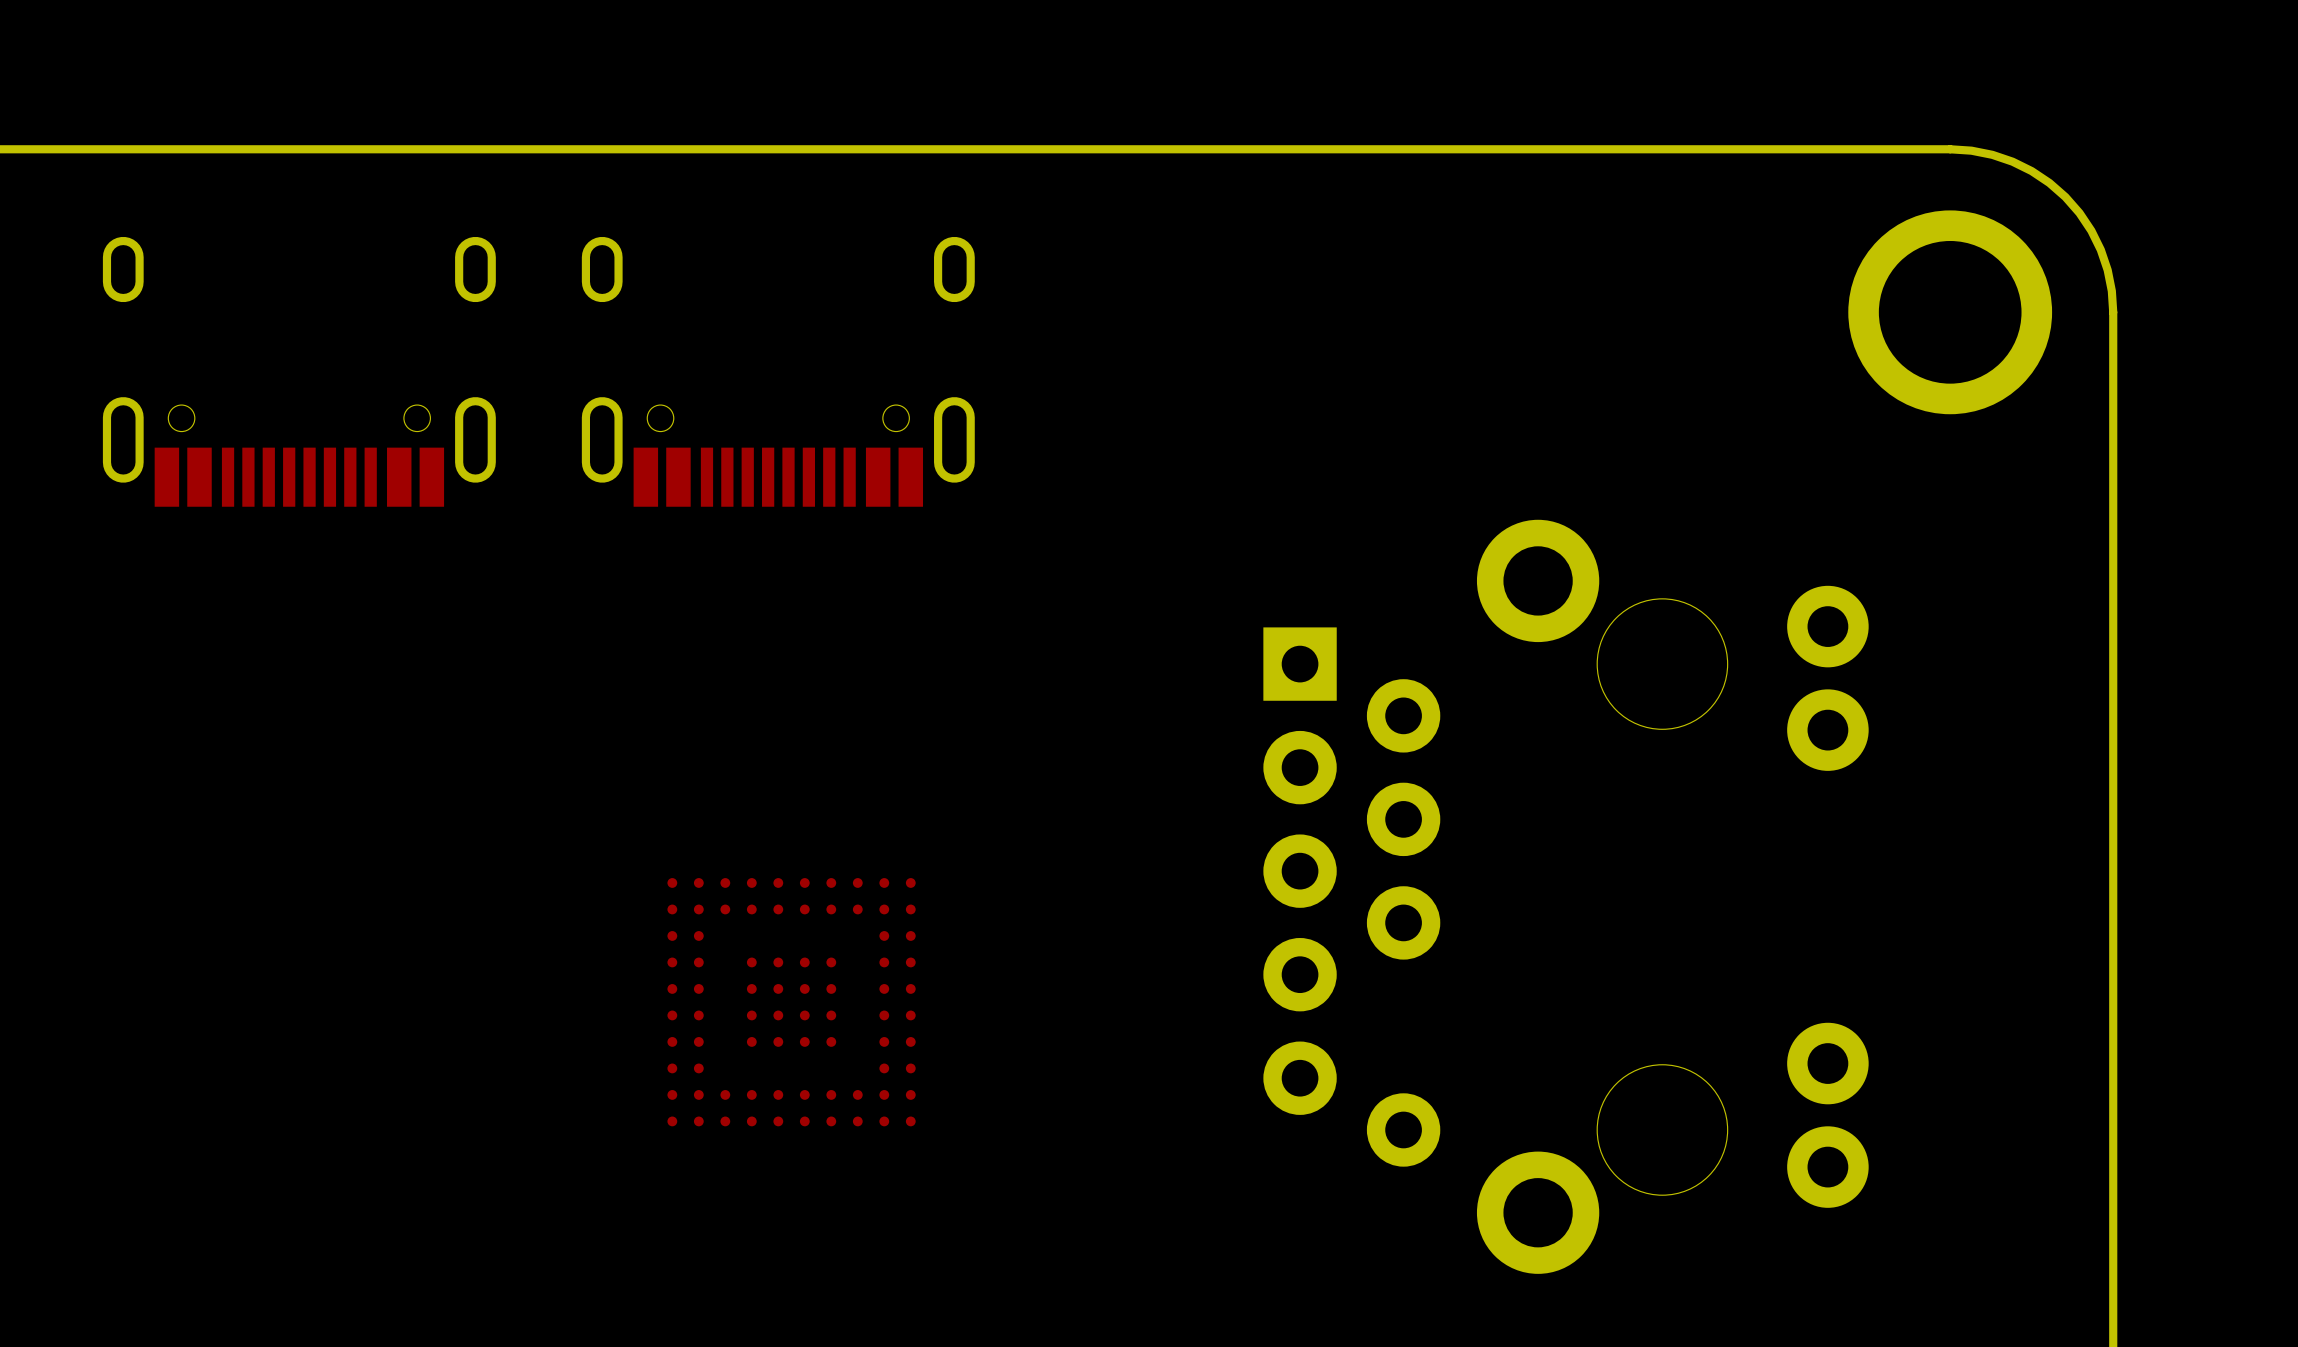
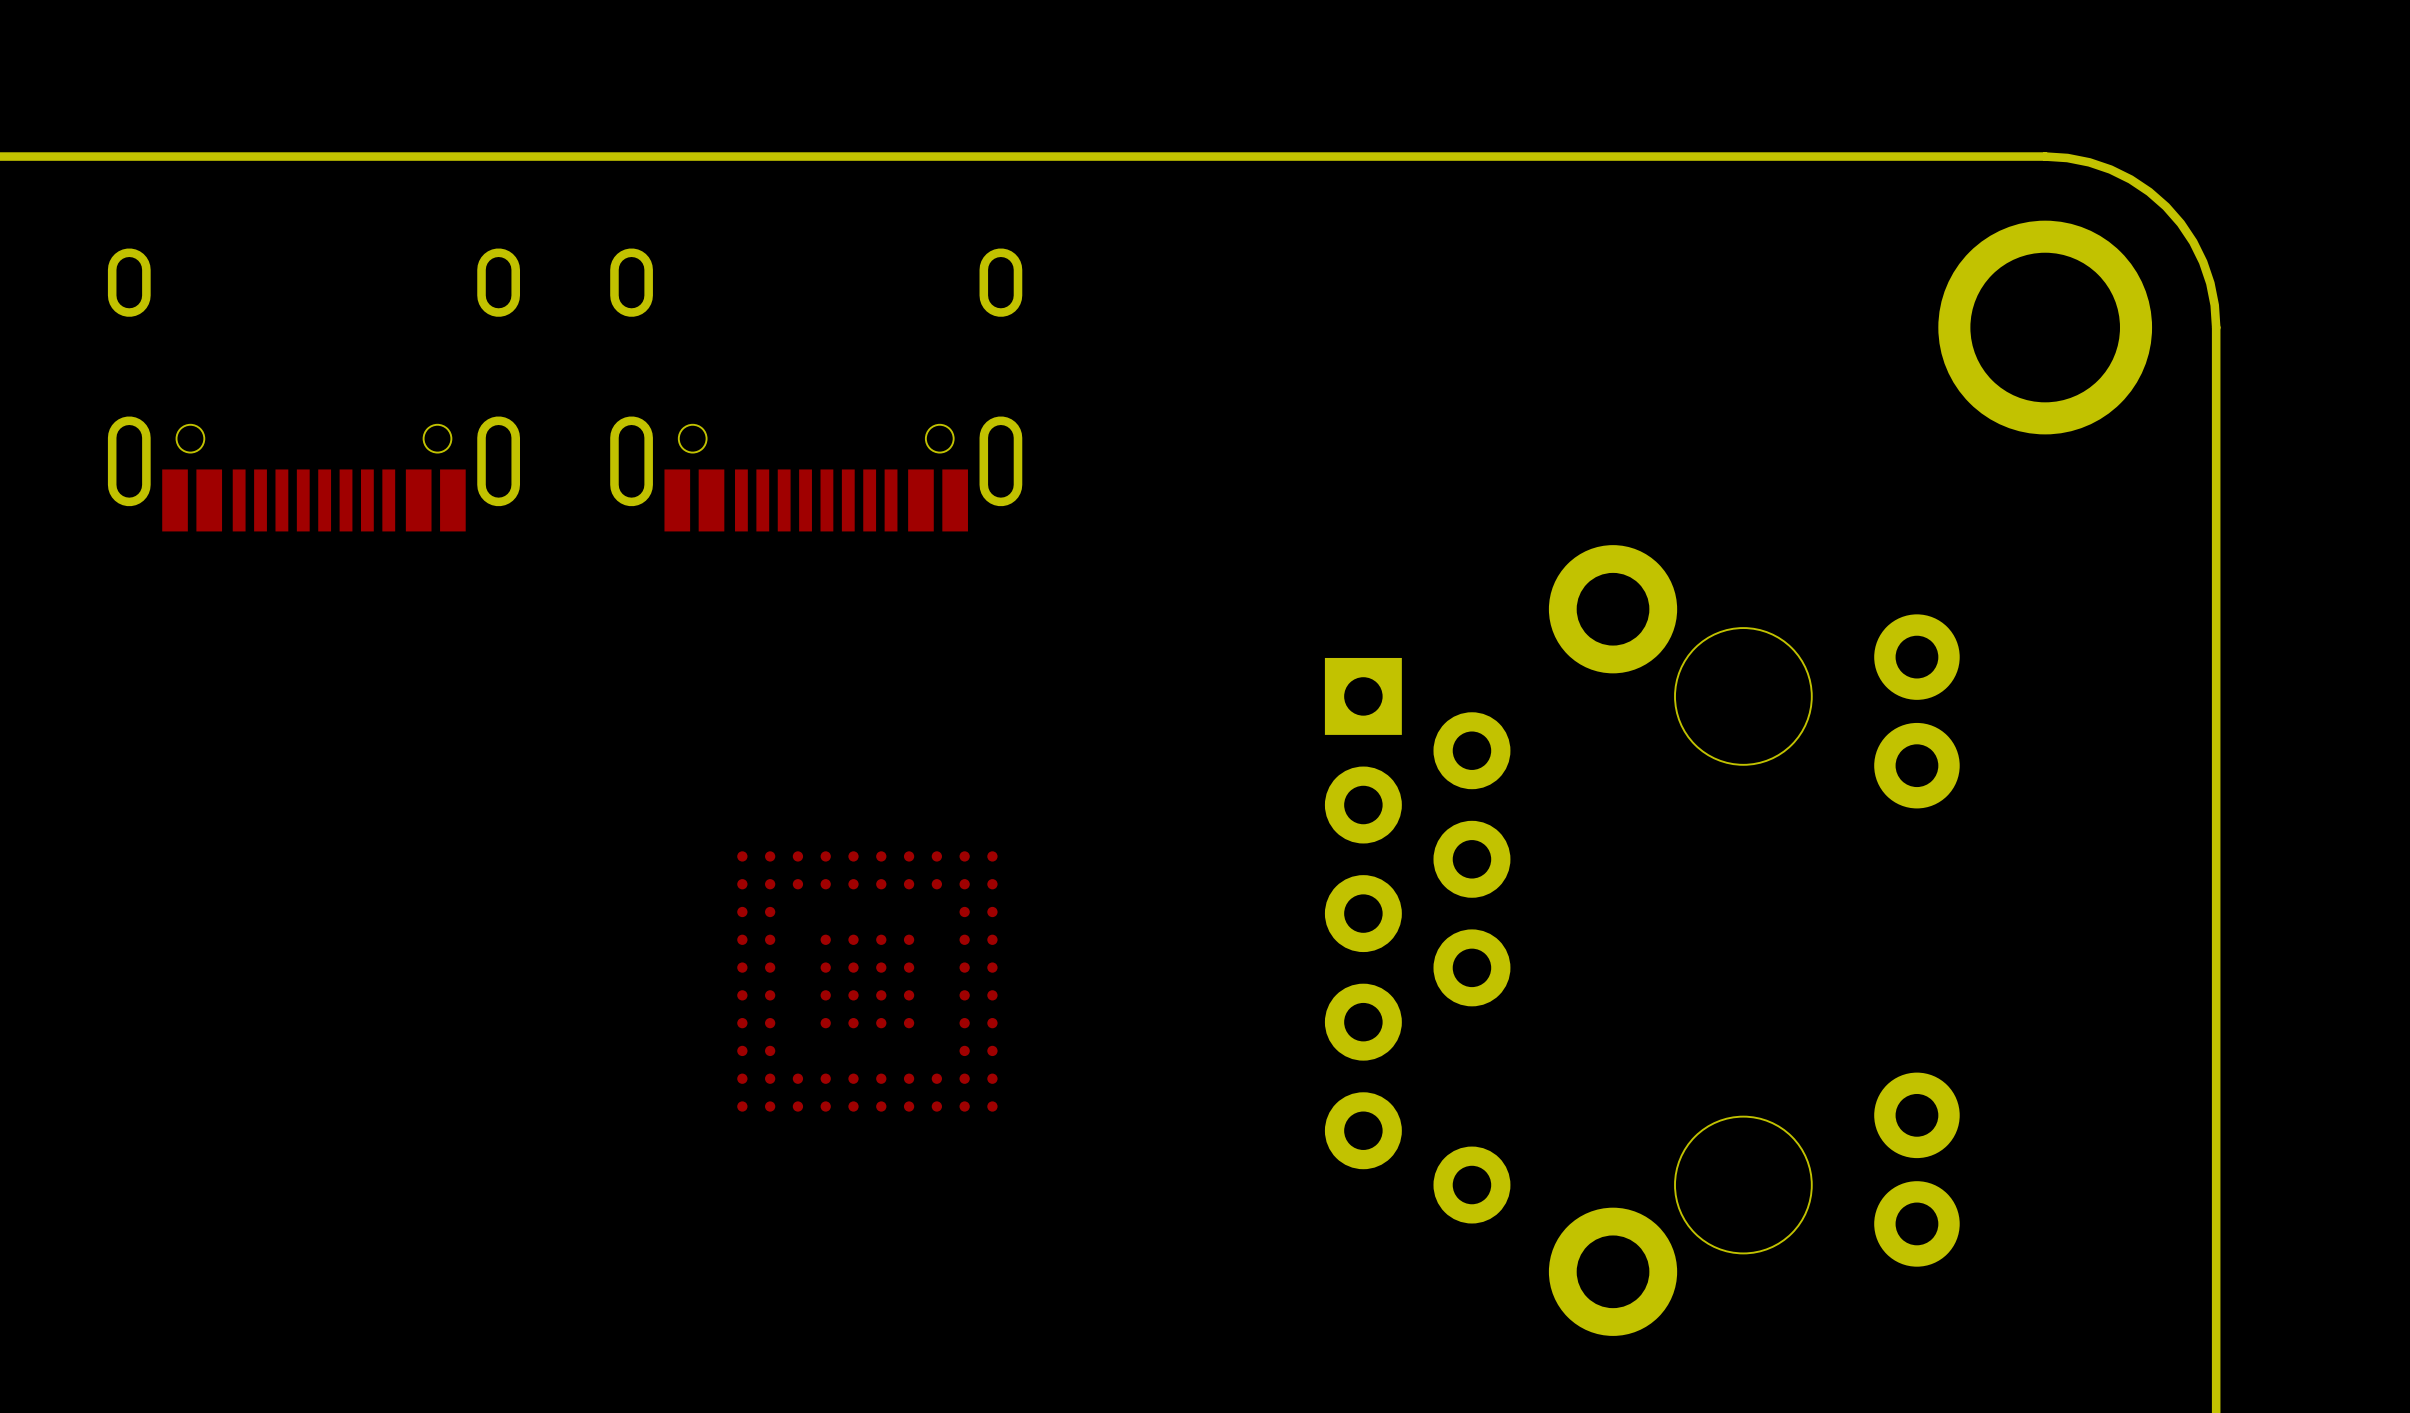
part position: (791, 1002) -> (867, 981)

